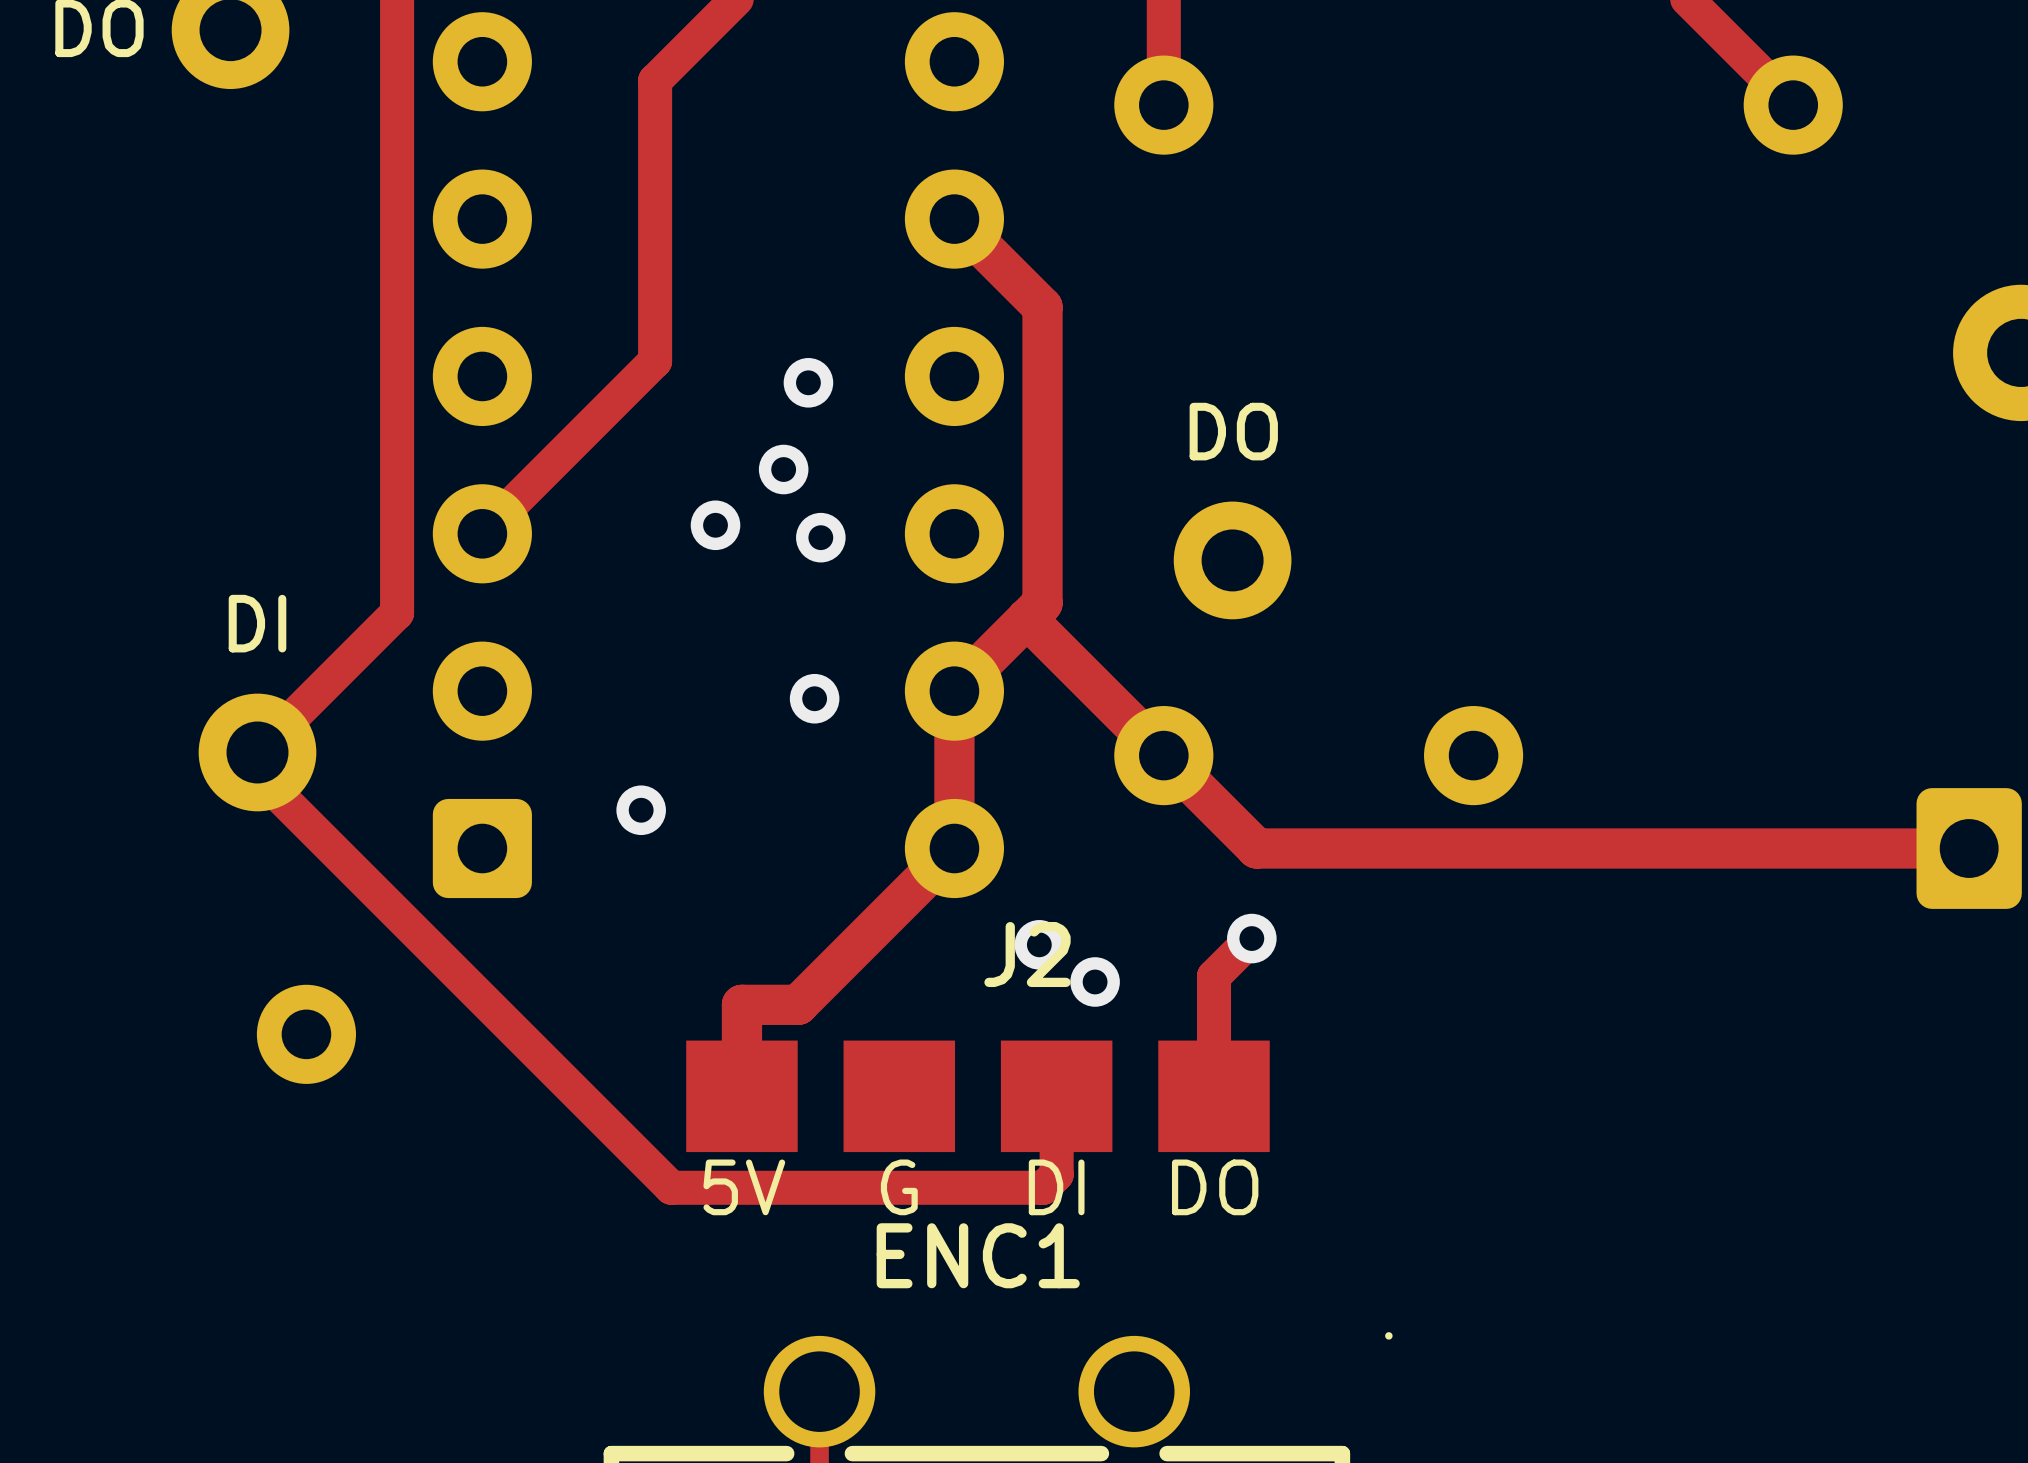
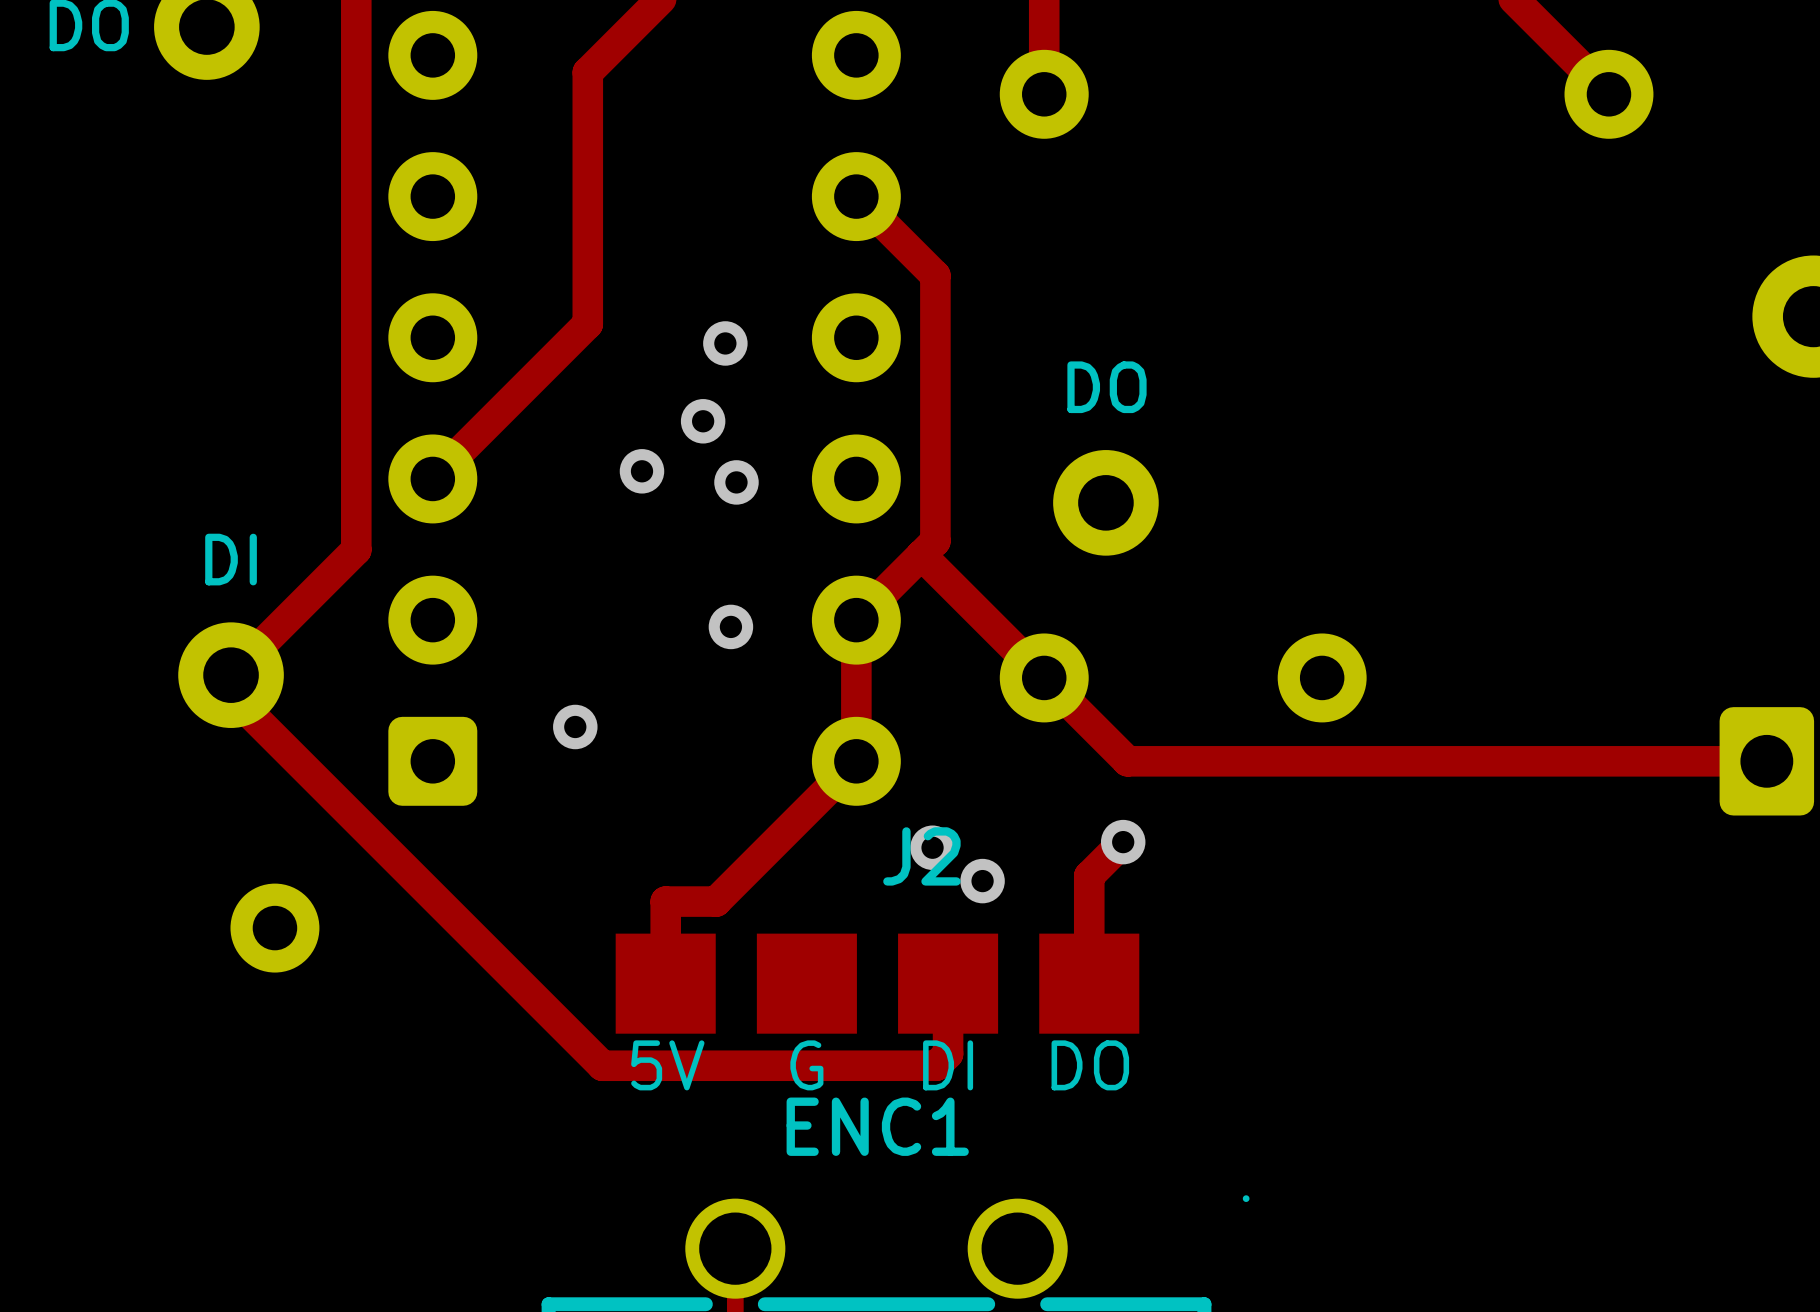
track width: thick (954, 219) (1042, 307) (1042, 603) (954, 691) (954, 848) (798, 1004) (741, 1004) (741, 1096) -> thin (856, 196) (935, 275) (935, 541) (856, 620) (856, 761) (716, 901) (665, 901) (665, 983)
track width: thick (1026, 618) (1256, 848) (1969, 848) -> thin (921, 555) (1127, 761) (1766, 761)

